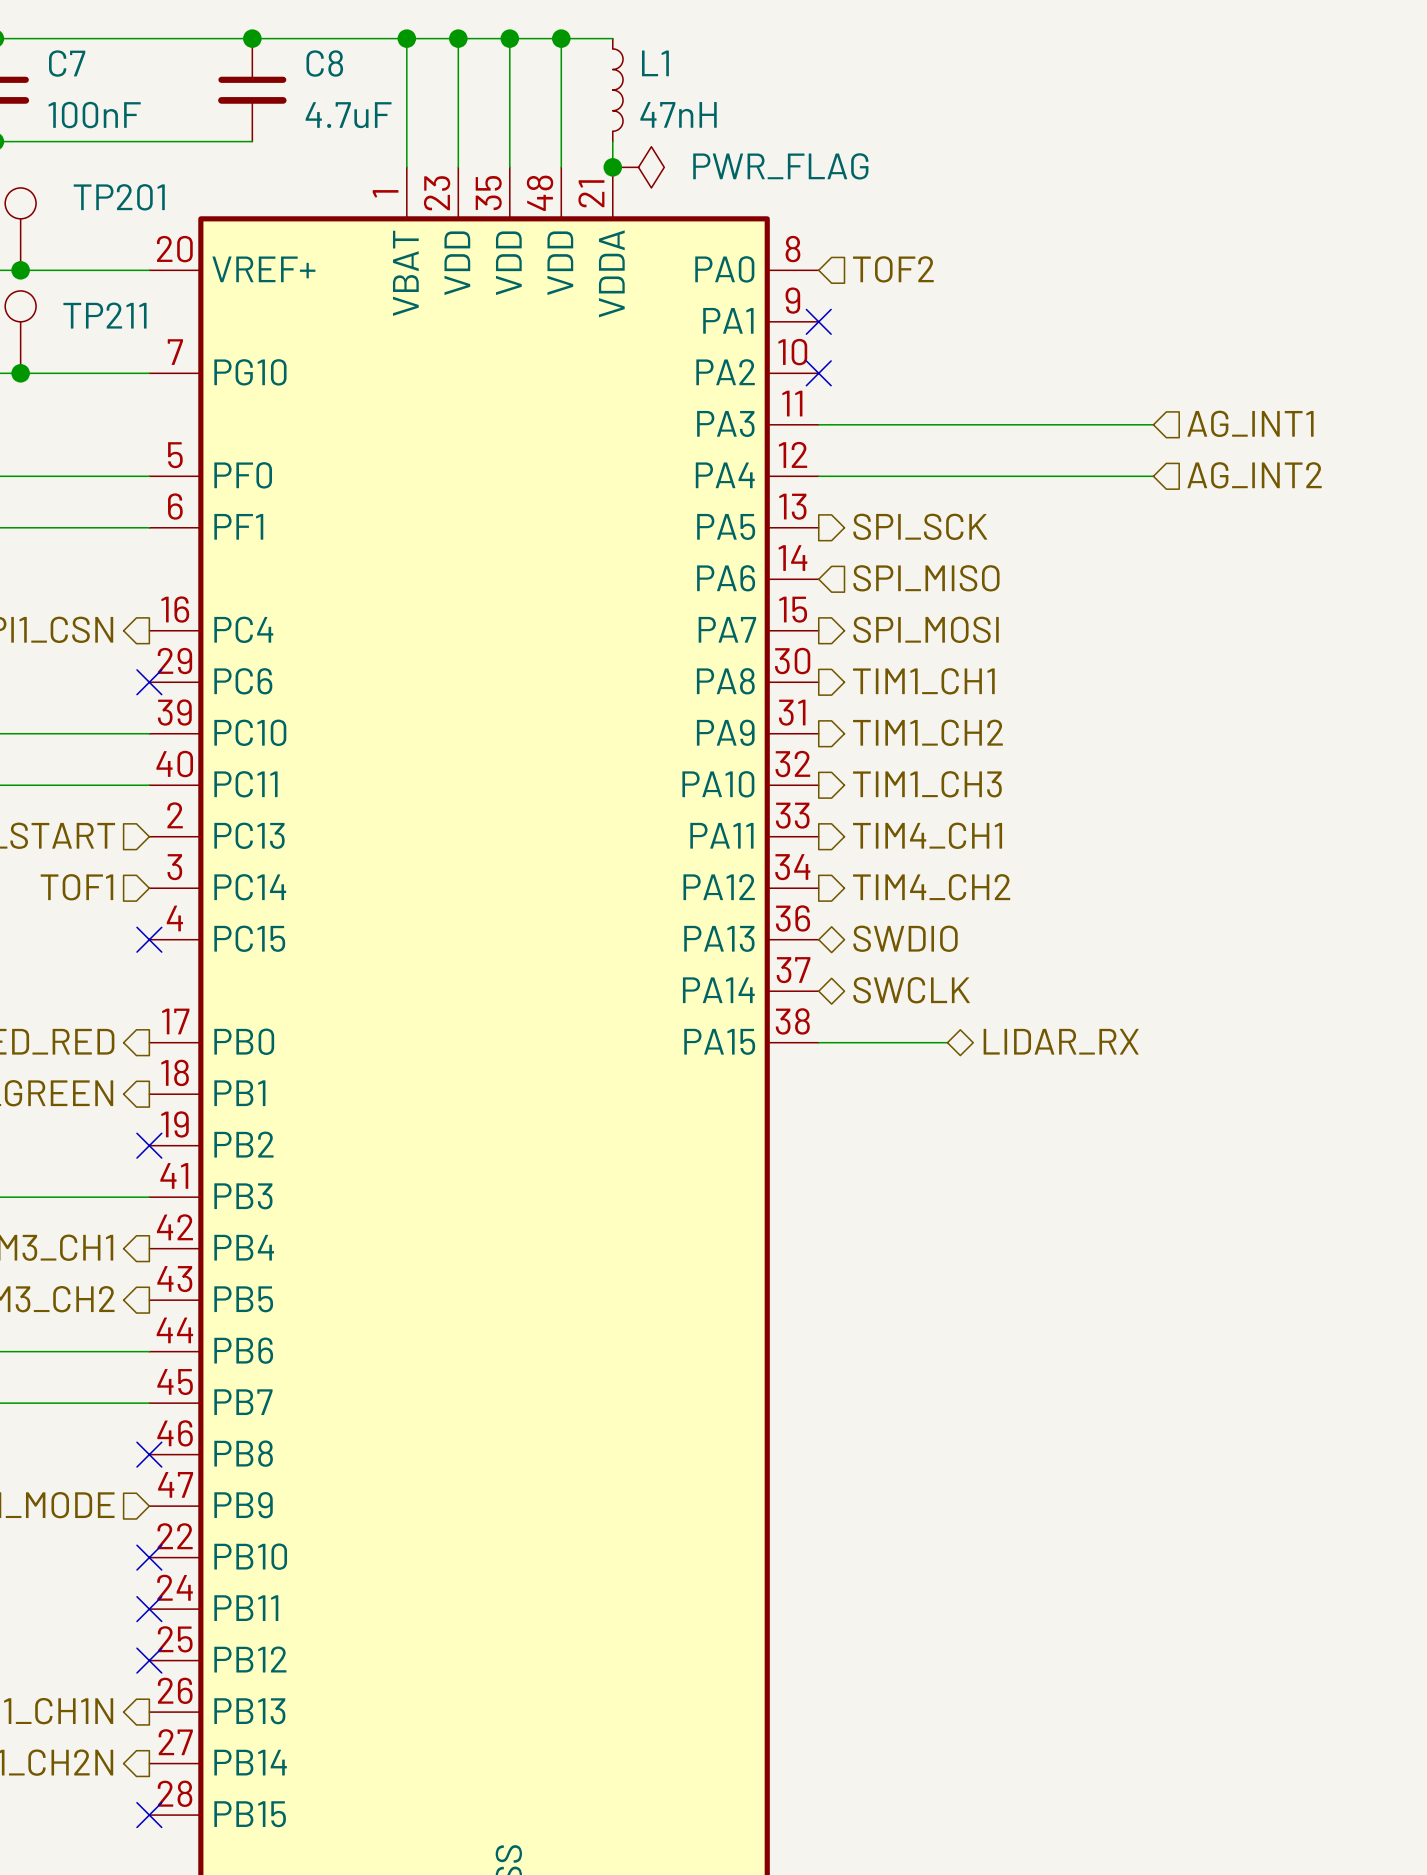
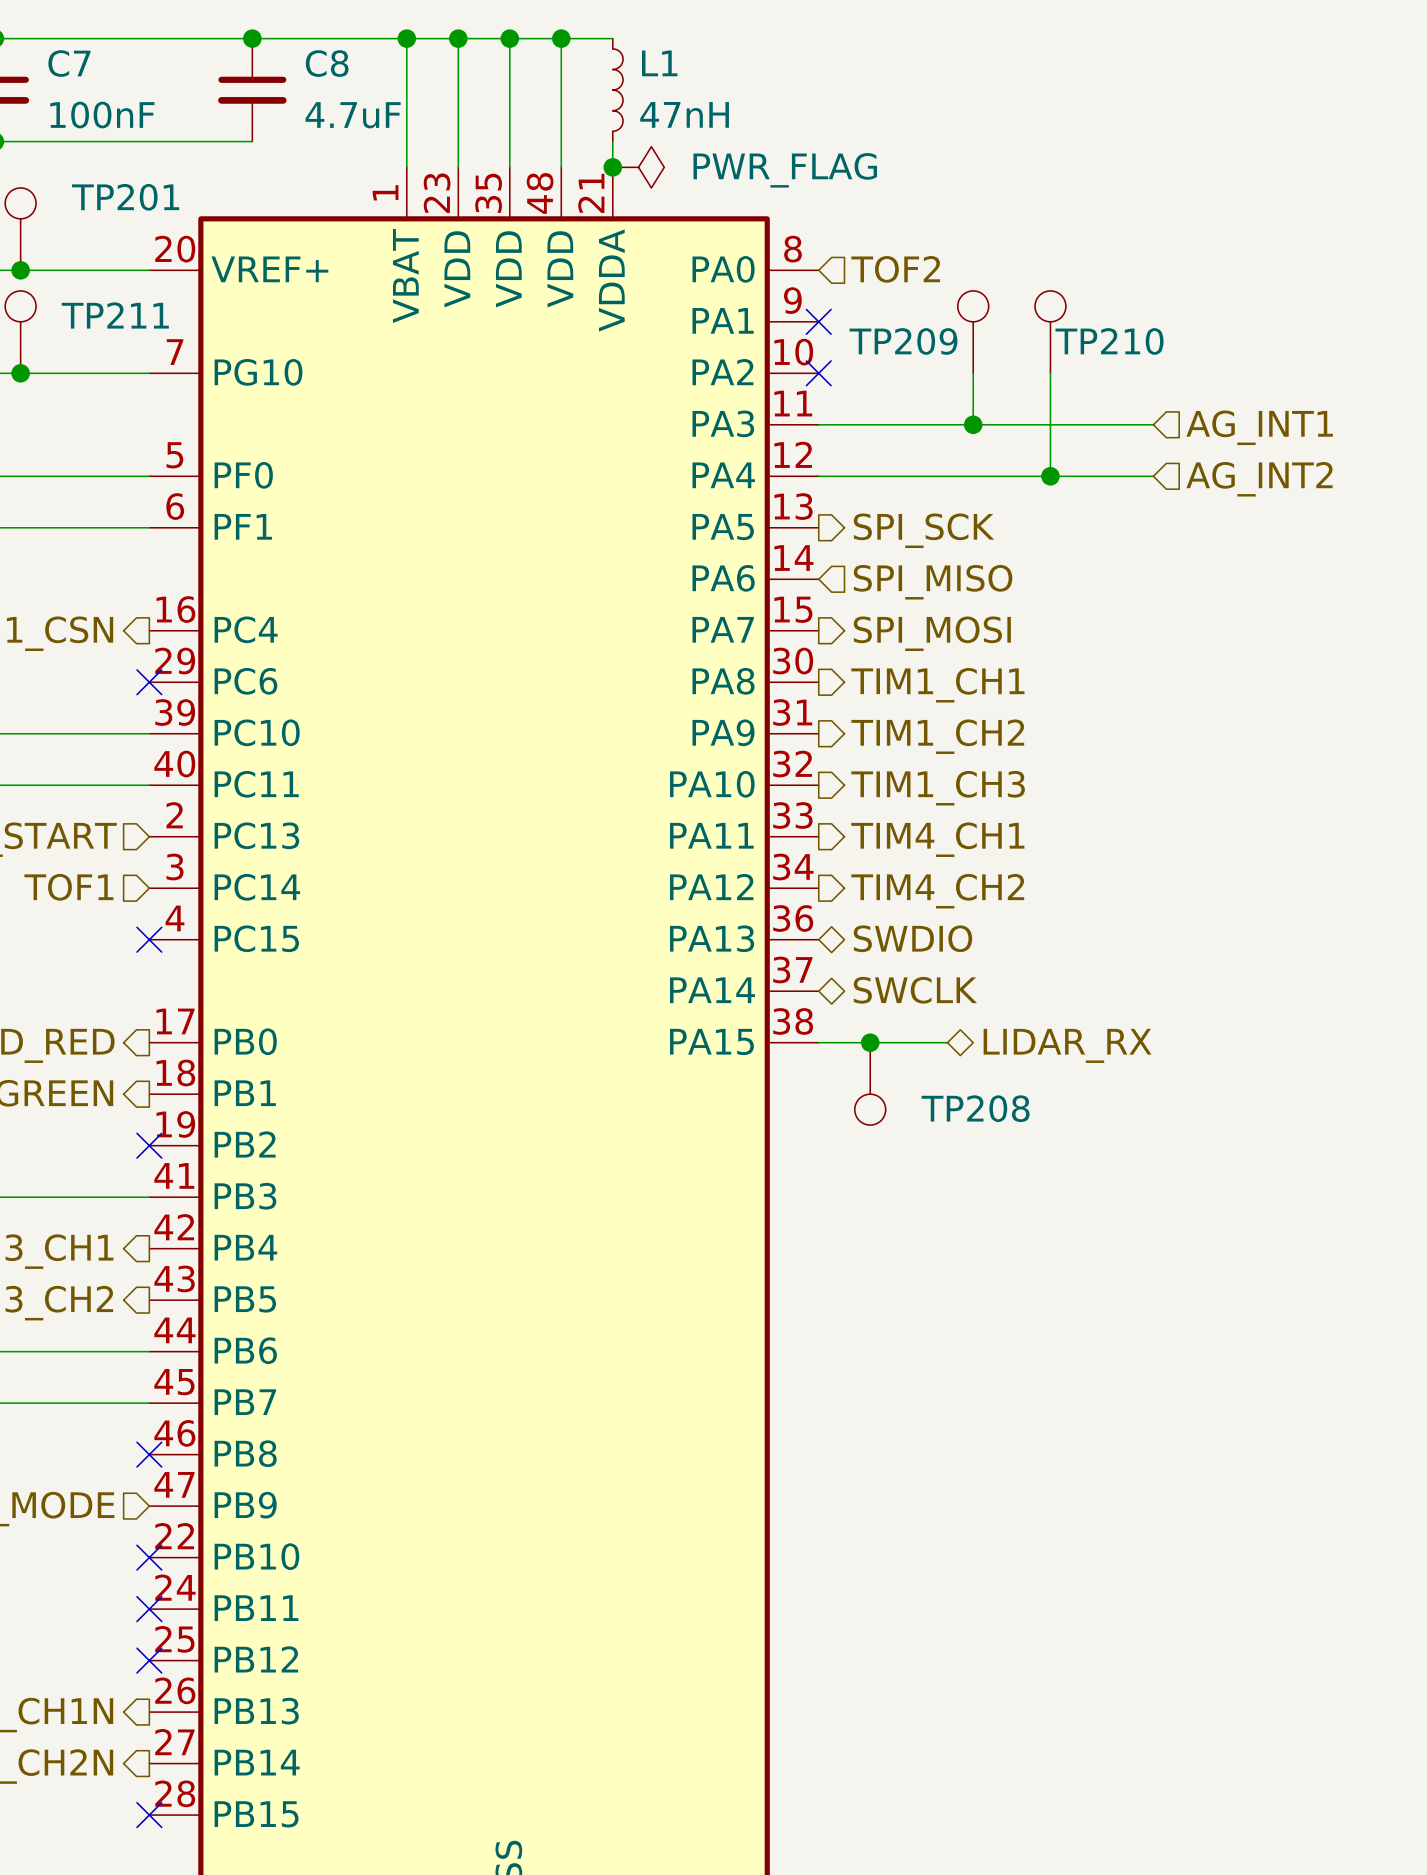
TP209: none -> (973, 332)
TP210: none -> (1050, 332)
wire: none -> (973, 373) (973, 424)
wire: none -> (1050, 373) (1050, 476)
junction: none -> (973, 424)
junction: none -> (1050, 476)
junction: none -> (870, 1042)
TP208: none -> (870, 1083)

